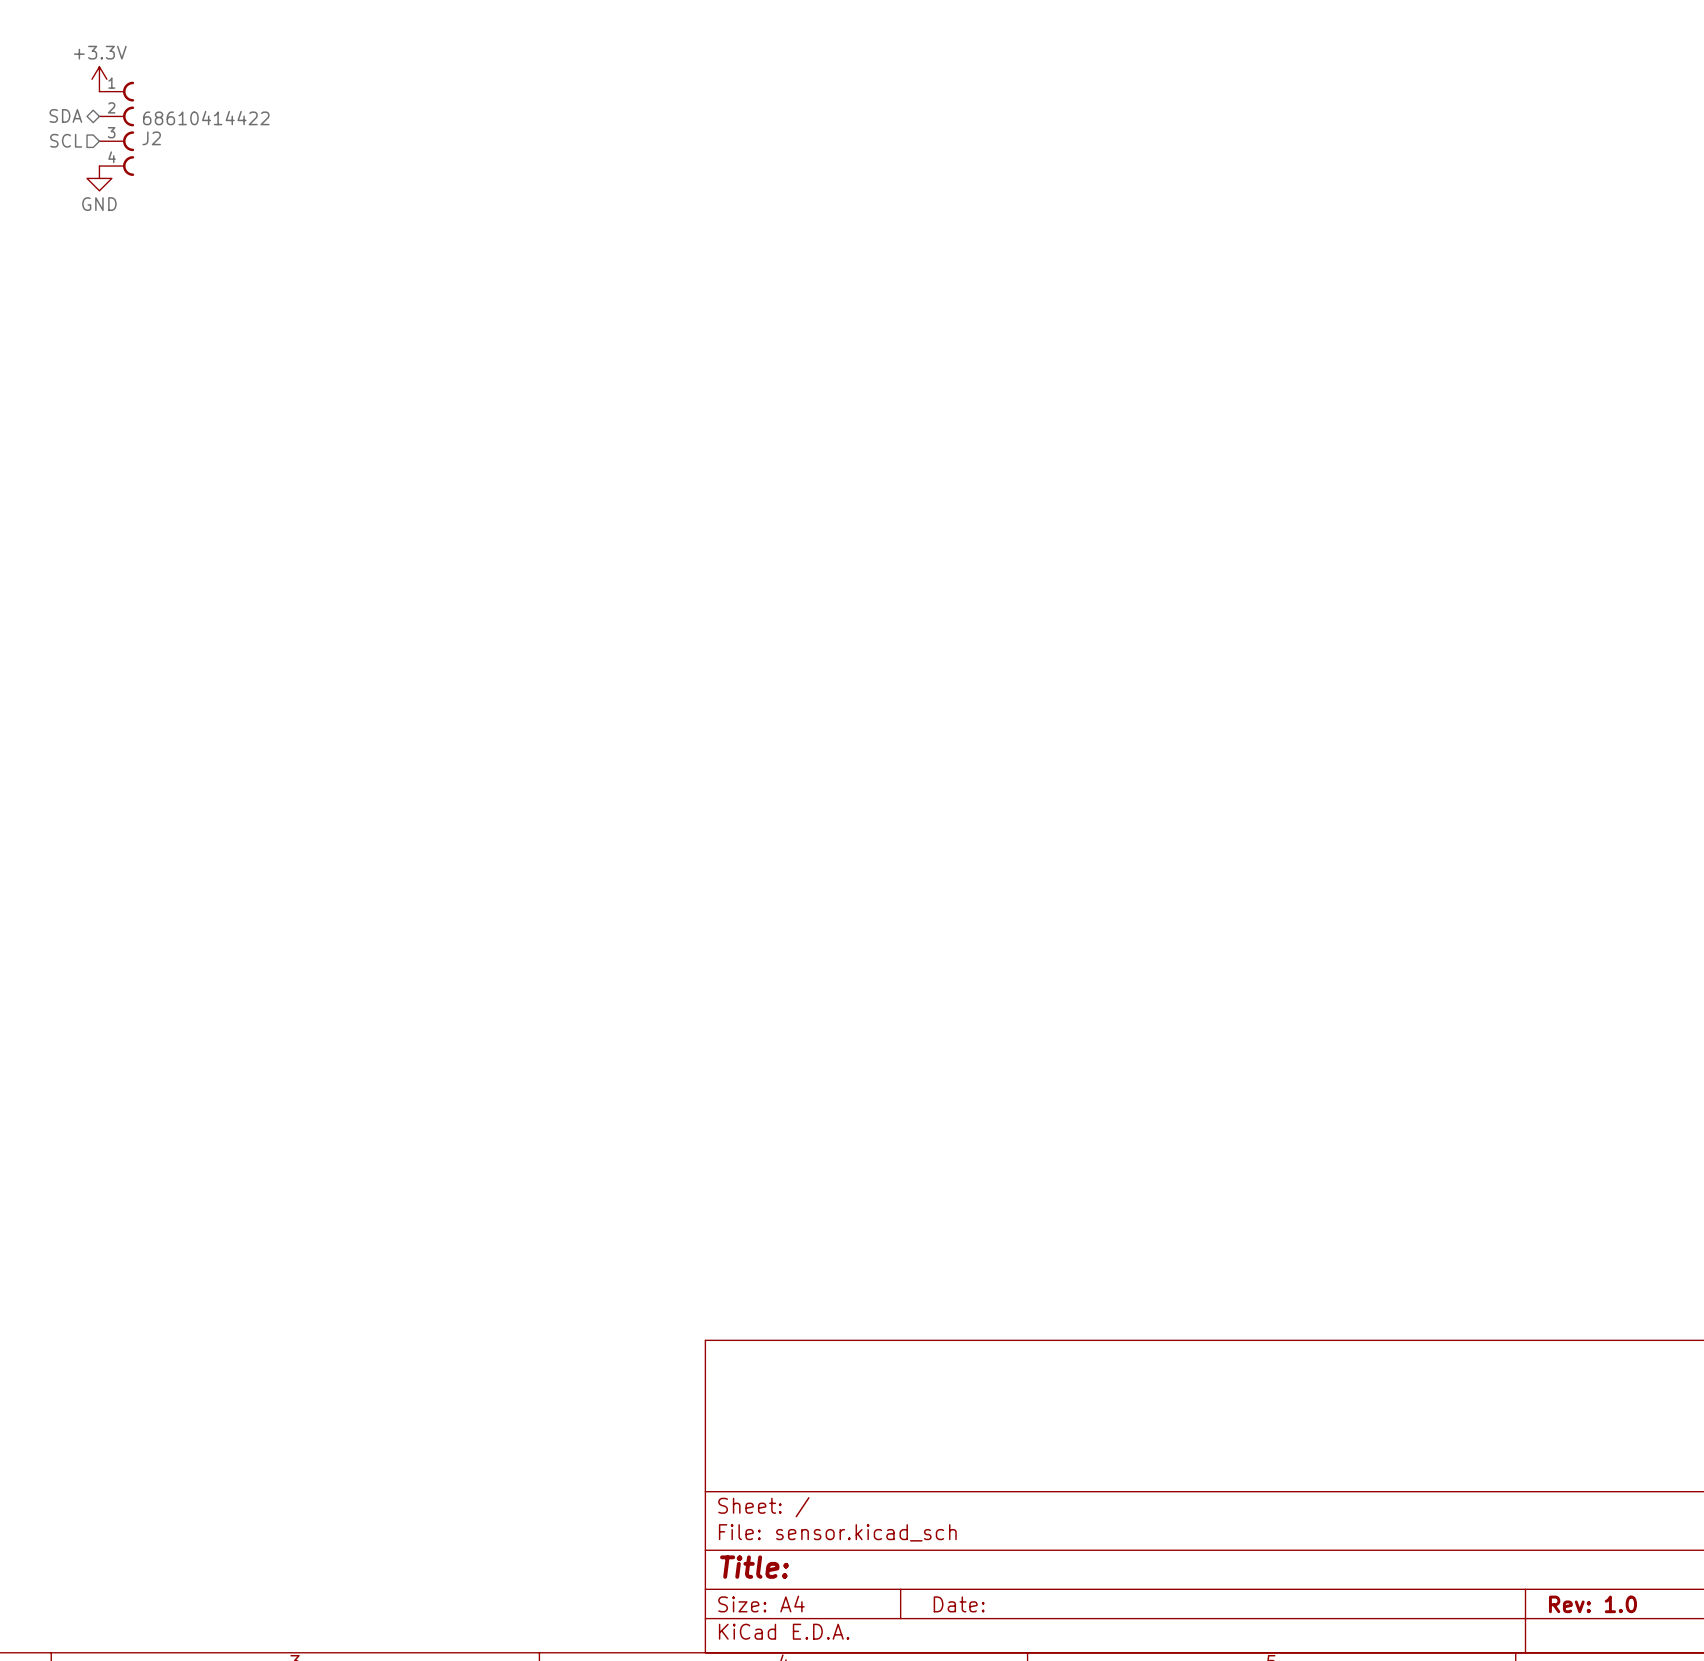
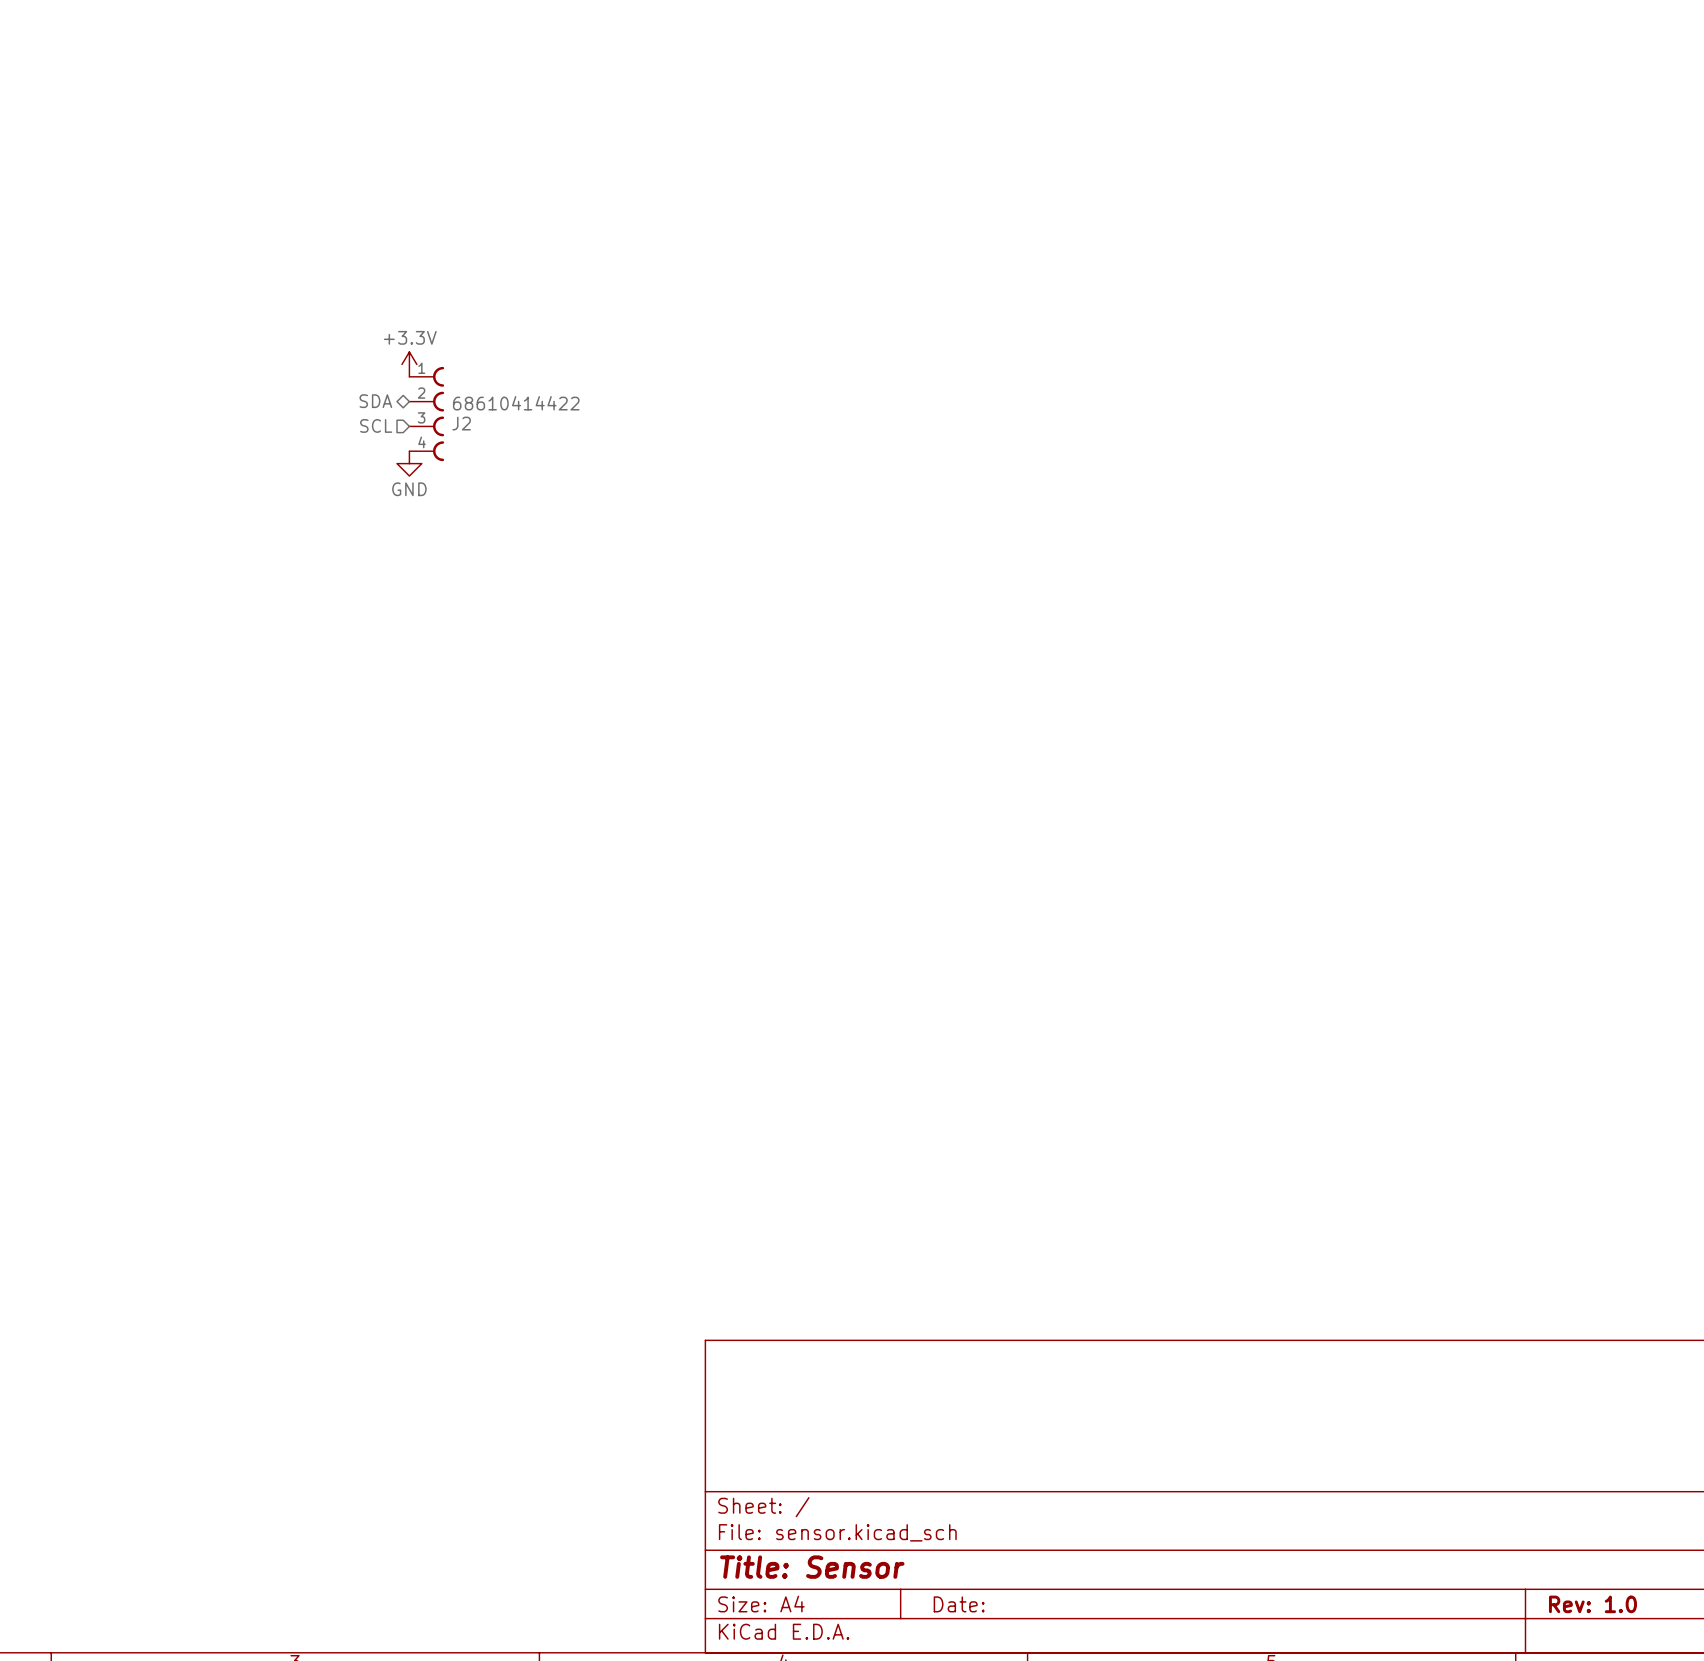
power symbol: +3.3V (99, 79) -> none
hierarchical label: SDA (65, 115) -> none
J2 position: (116, 128) -> (426, 414)
hierarchical label: SCL (66, 140) -> none
power symbol: GND (99, 178) -> none
power symbol: none -> +3.3V (409, 364)
hierarchical label: none -> SDA (375, 401)
hierarchical label: none -> SCL (376, 425)
power symbol: none -> GND (409, 463)
title block: Title: (754, 1567) -> Title: Sensor (812, 1567)

